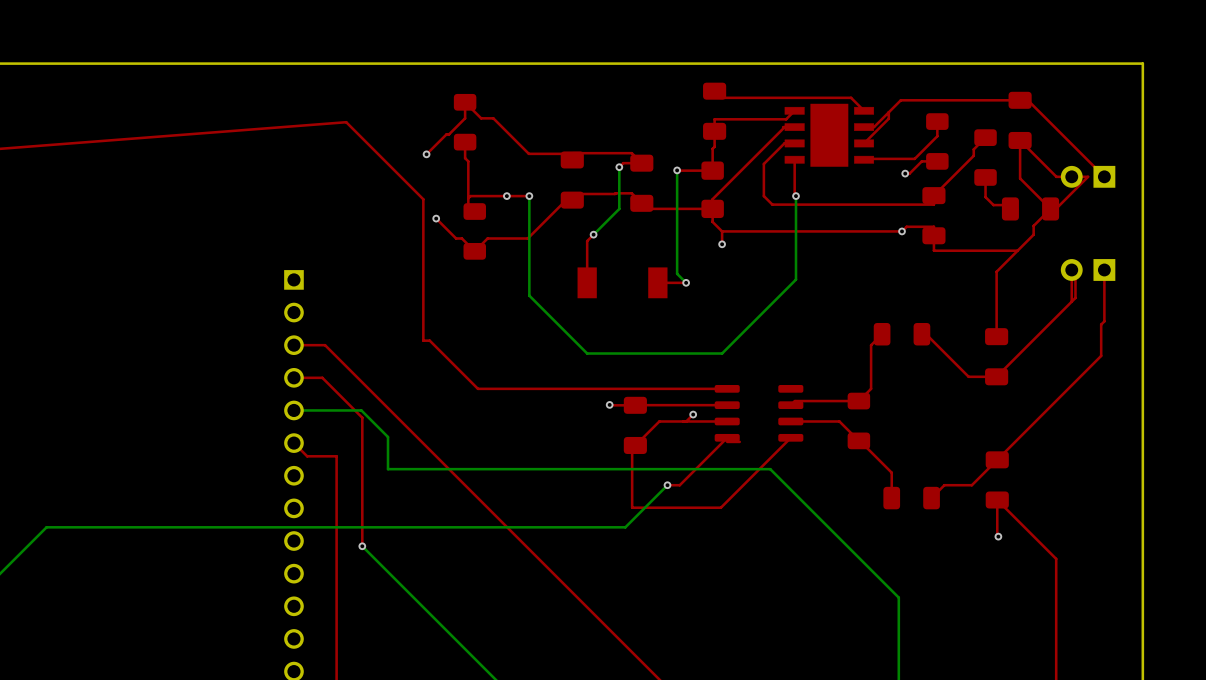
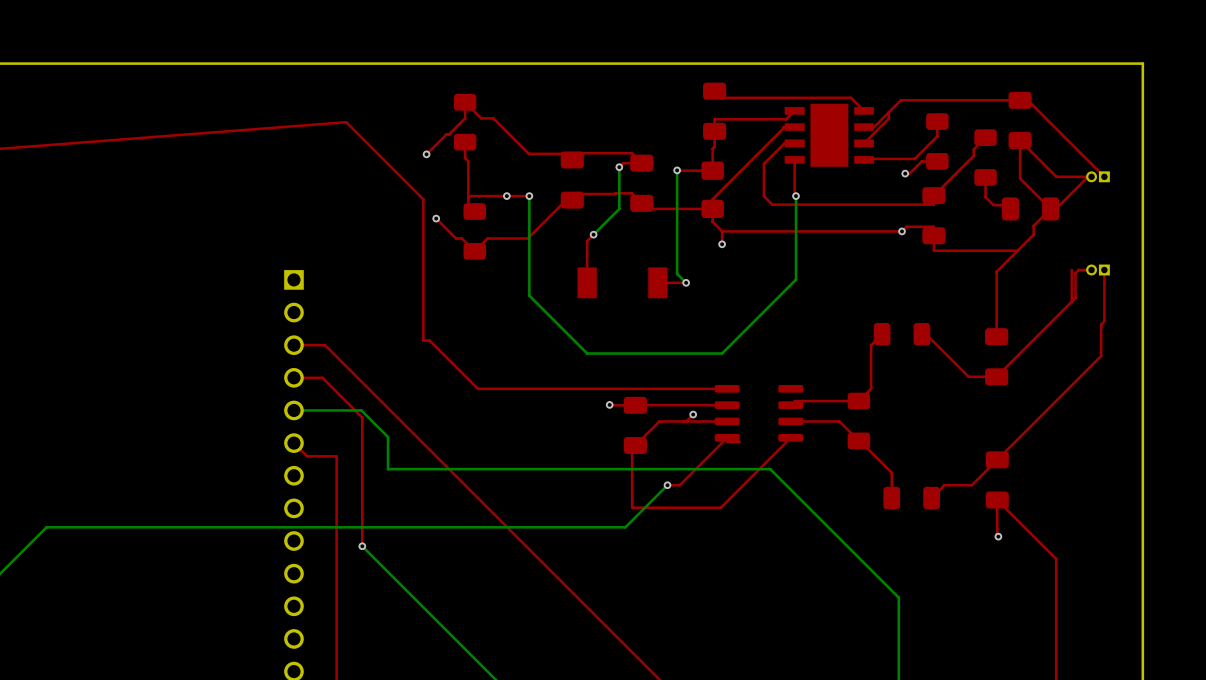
part footprint: [1060, 165, 1116, 188] -> [1086, 171, 1110, 183]
part footprint: [1060, 259, 1116, 281] -> [1086, 264, 1110, 276]
top track: none -> (1091, 269) (1078, 269)

